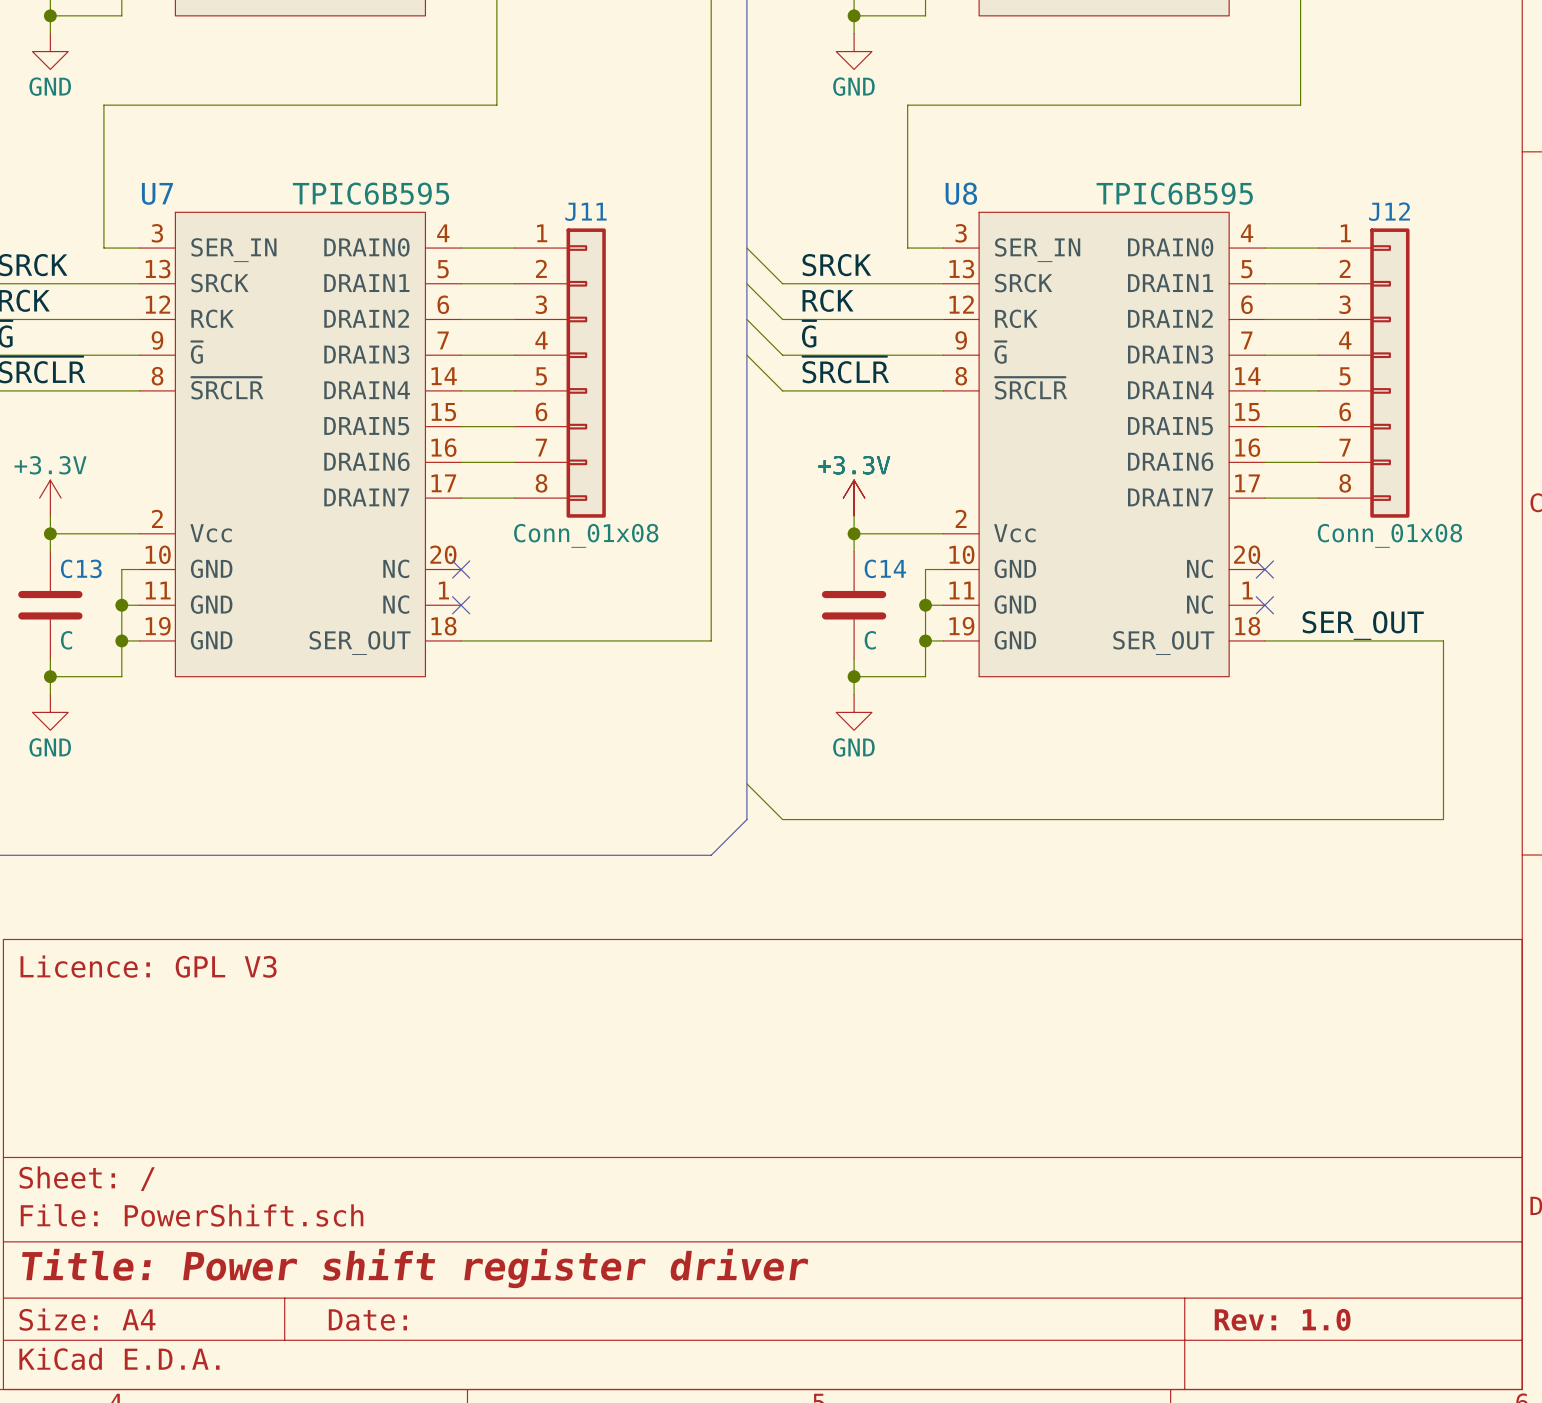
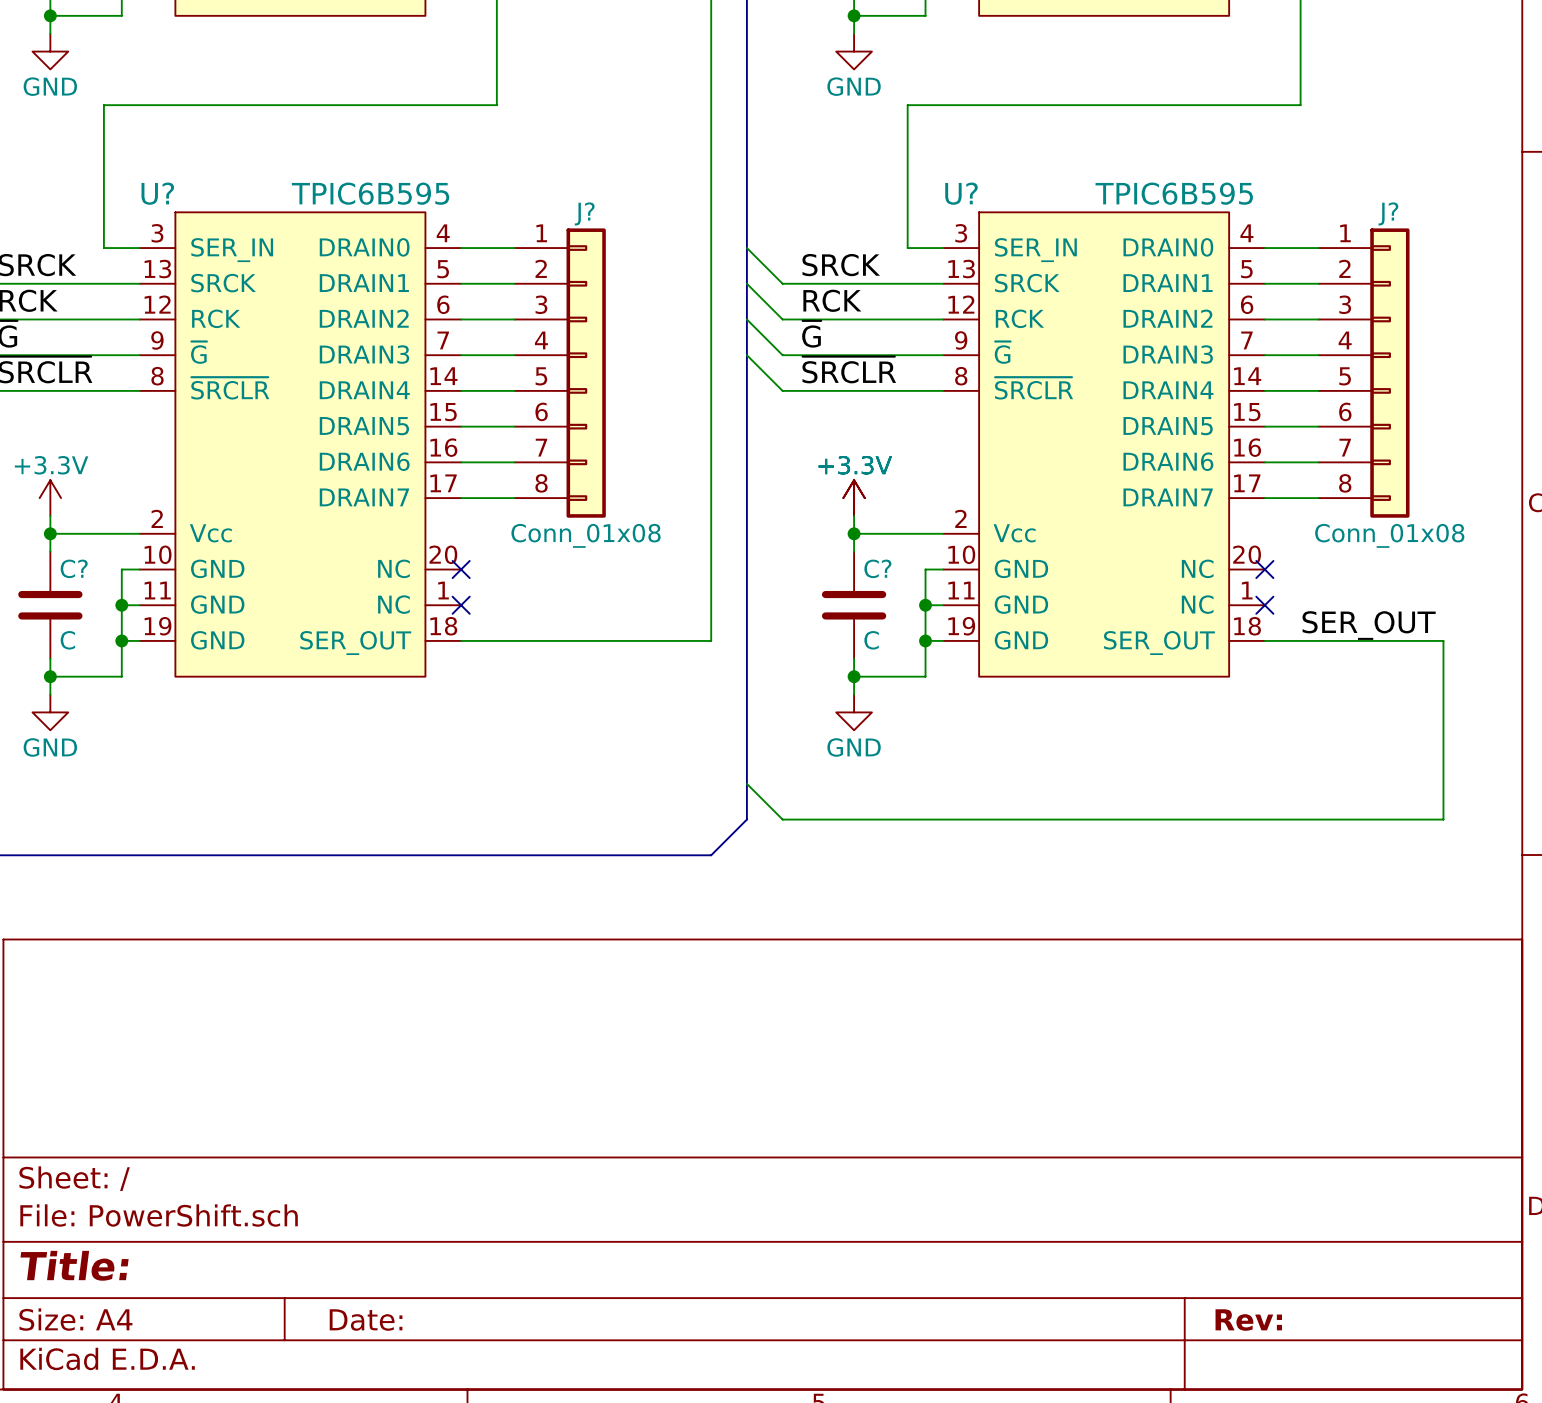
U7 name: U7 (157, 193) -> U? (157, 193)
U8 name: U8 (961, 193) -> U? (961, 193)
J11 name: J11 (586, 211) -> J? (584, 213)
J12 name: J12 (1389, 211) -> J? (1388, 213)
C13 name: C13 (81, 568) -> C? (74, 568)
C14 name: C14 (885, 568) -> C? (877, 568)
title block: Licence: GPL V3 (148, 966) -> none
title block: Title: Power shift register driver (415, 1268) -> Title: (74, 1265)
title block: Rev: 1.0 (1282, 1319) -> Rev: (1248, 1320)

